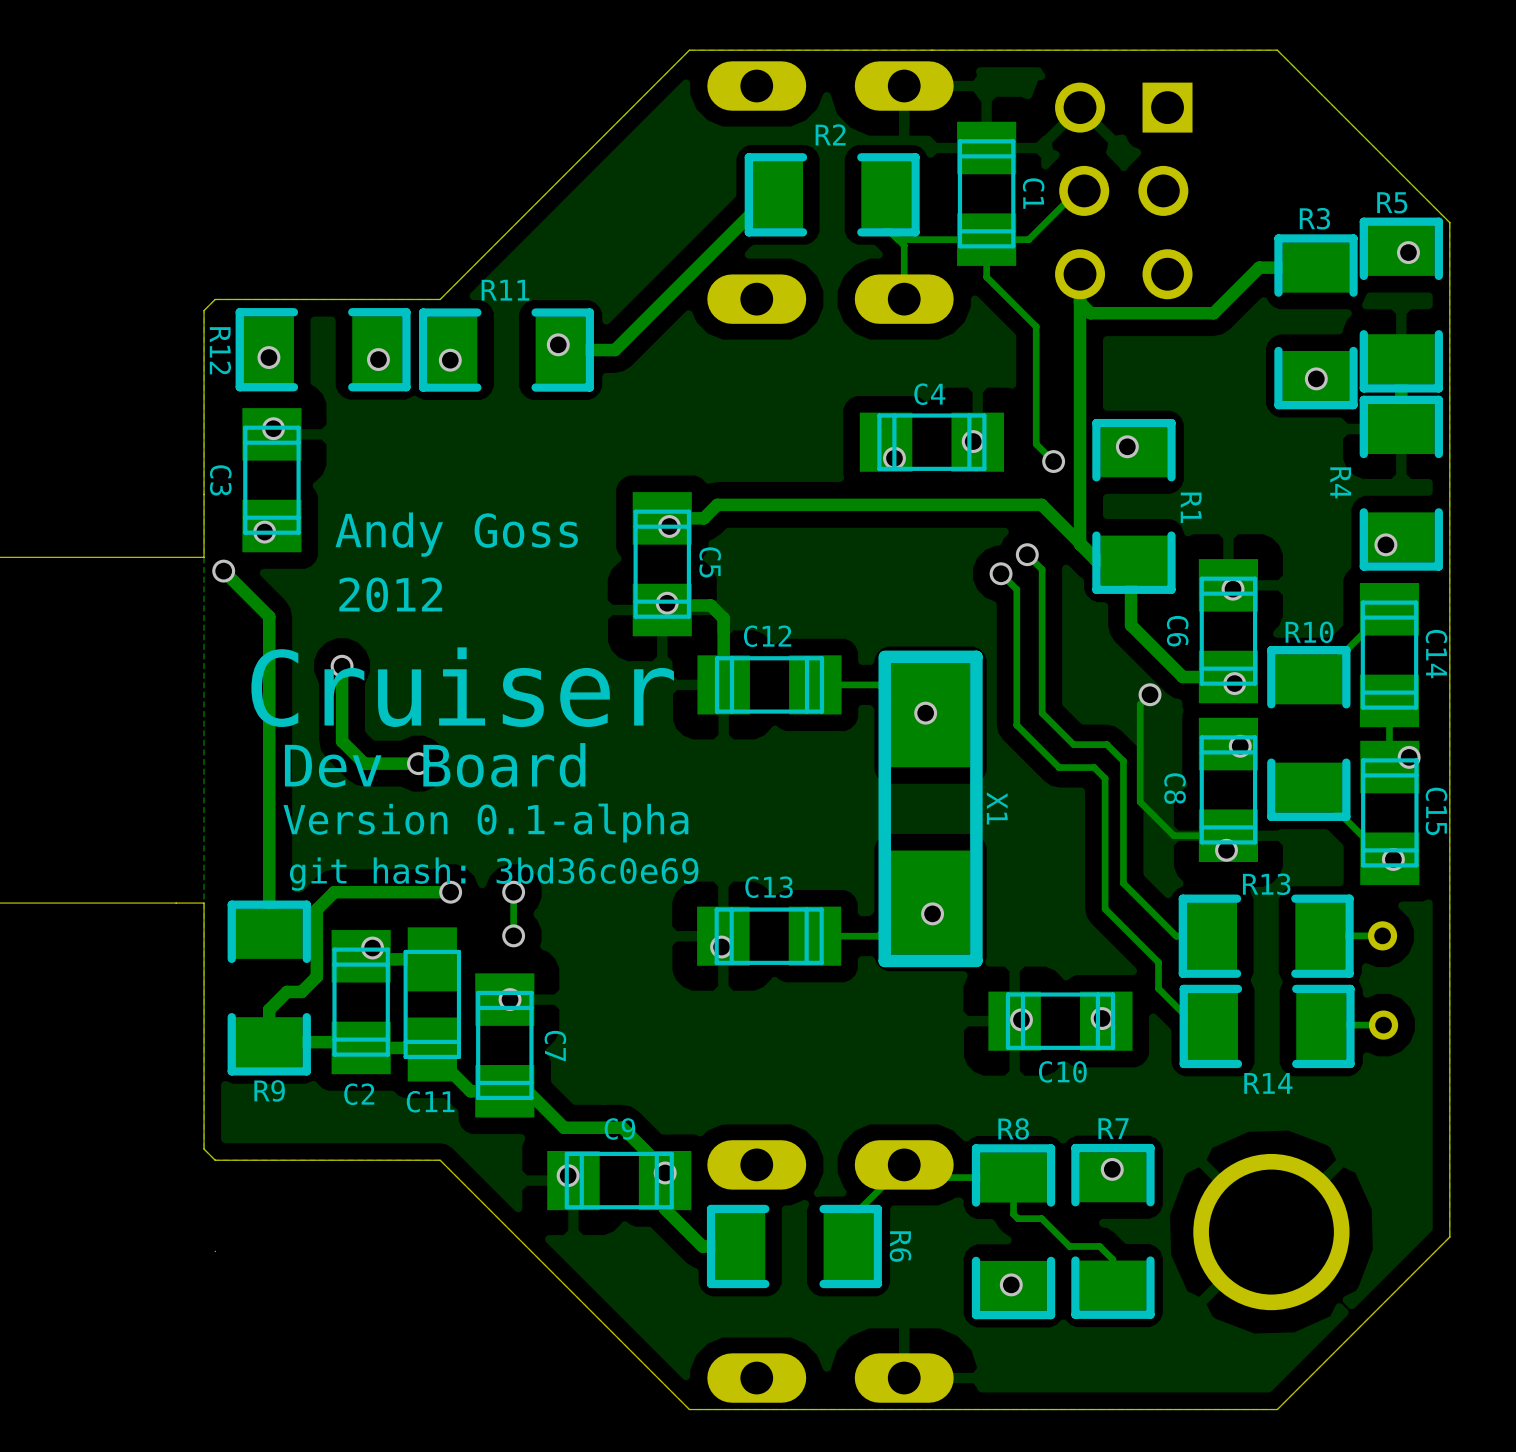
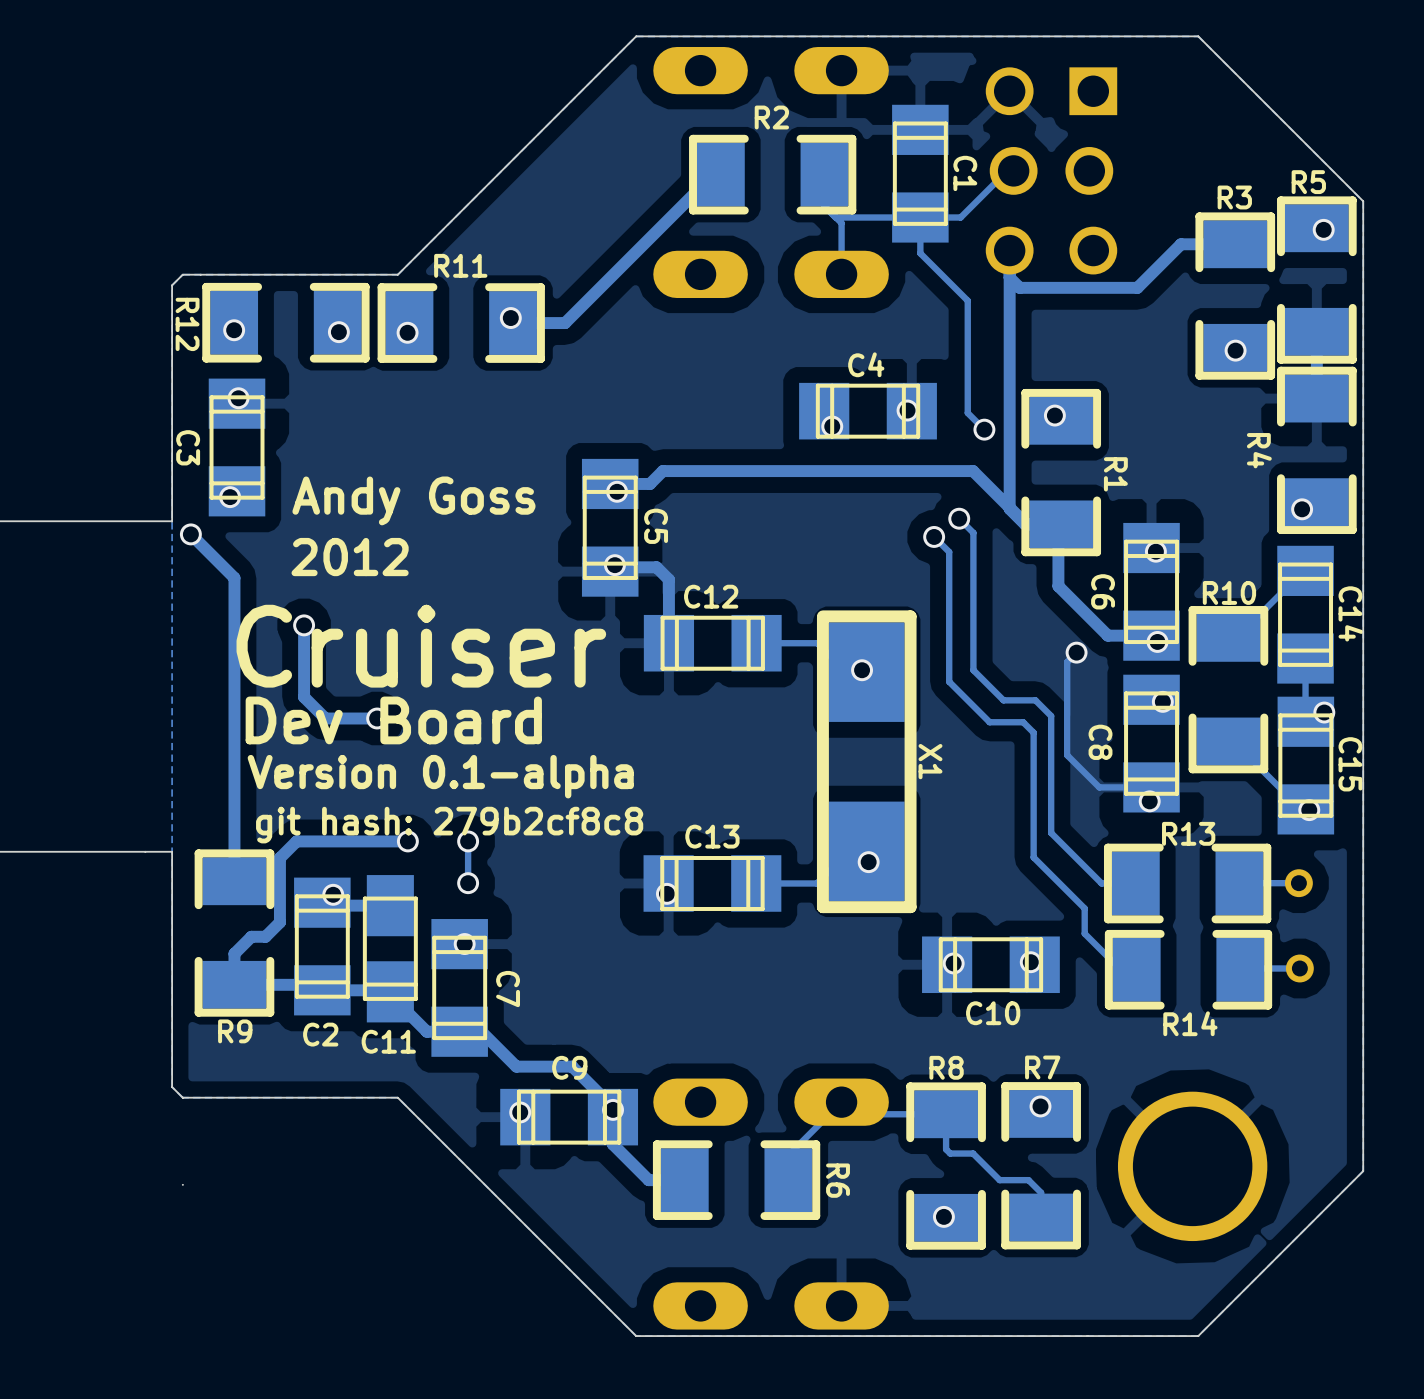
text: git hash: 3bd36c0e69 (494, 874) -> git hash: 279b2cf8c8 (449, 825)

